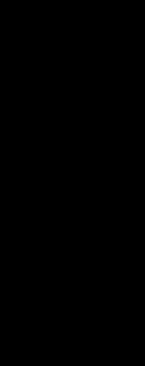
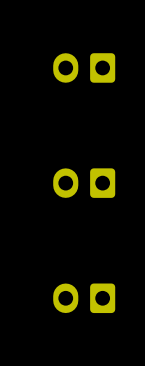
part: none -> (84, 67)
part: none -> (84, 183)
part: none -> (84, 298)

